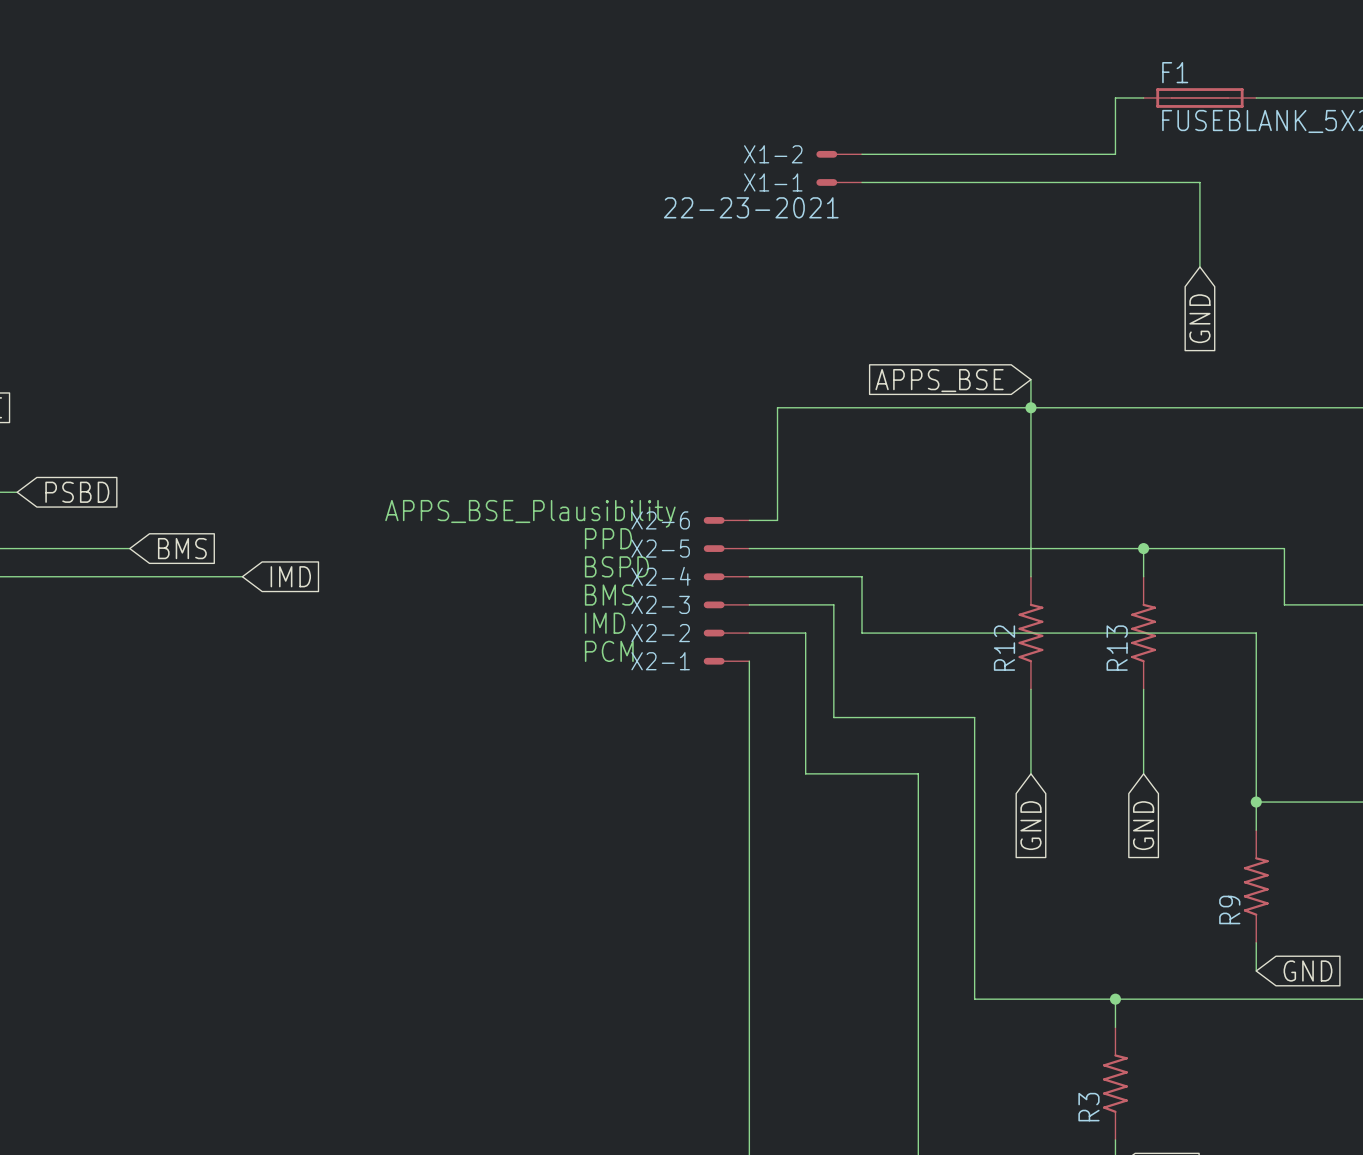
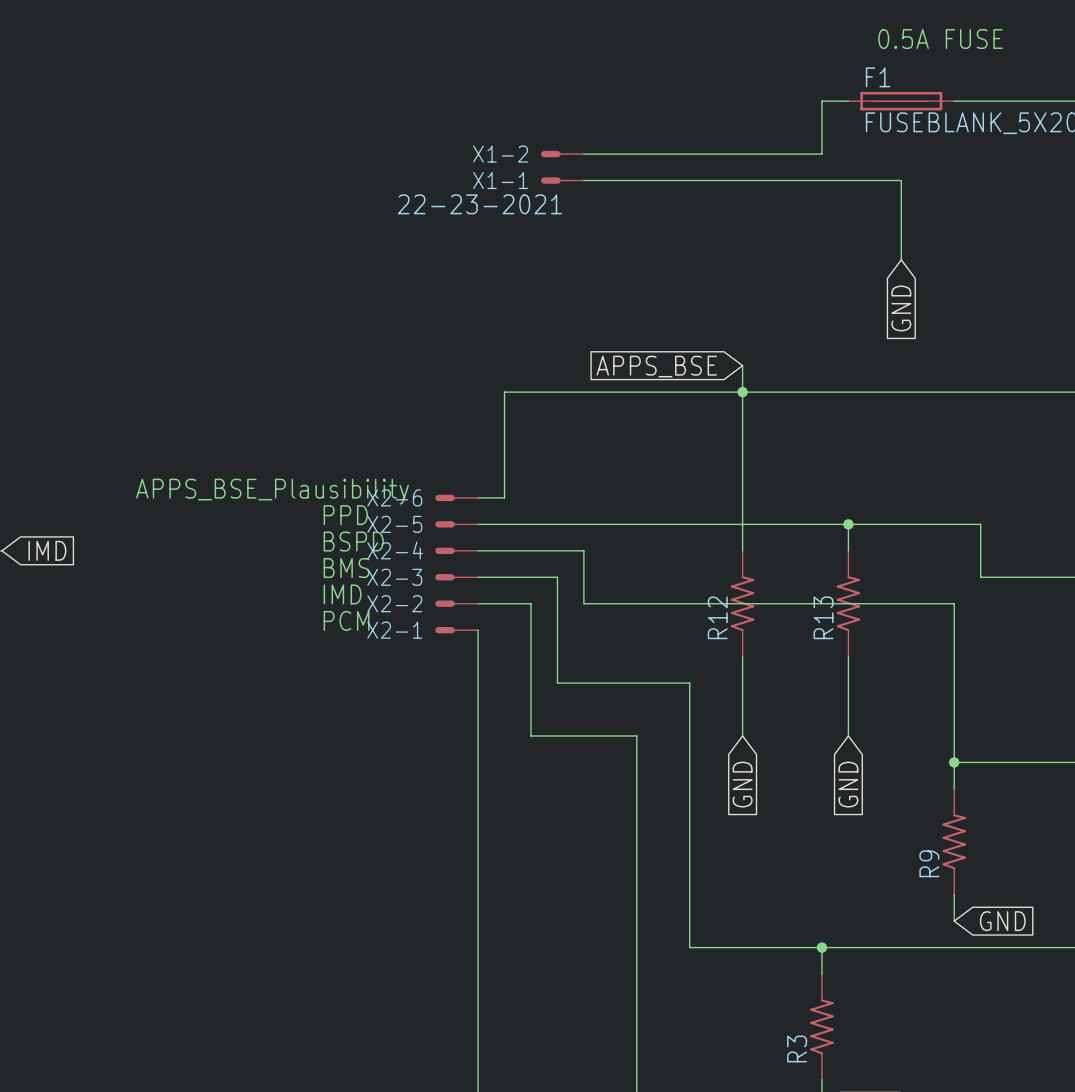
text: none -> 0.5A FUSE (940, 39)

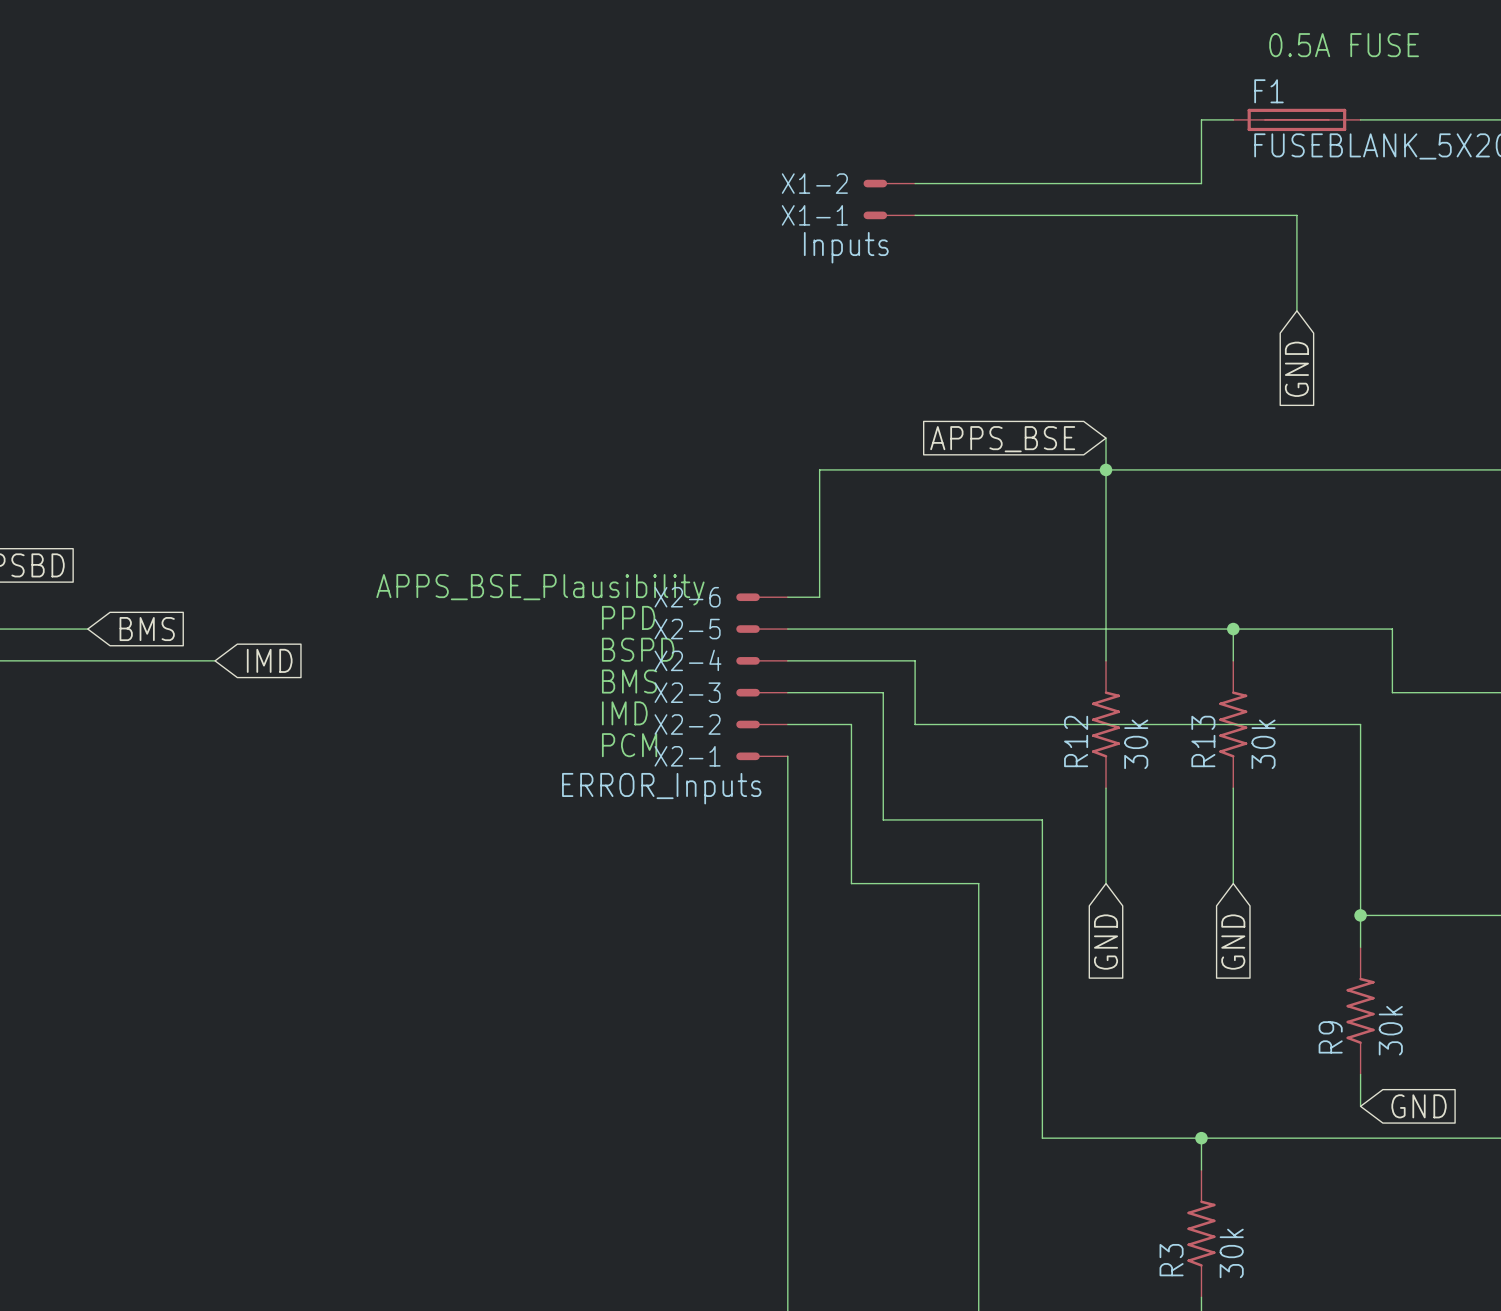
X1-1 value: 22-23-2021 (479, 204) -> Inputs (846, 247)
R12 value: none -> 30k (1136, 744)
R13 value: none -> 30k (1263, 744)
X2-1 value: none -> ERROR_Inputs (661, 788)
R9 value: none -> 30k (1390, 1030)
R3 value: none -> 30k (1231, 1253)

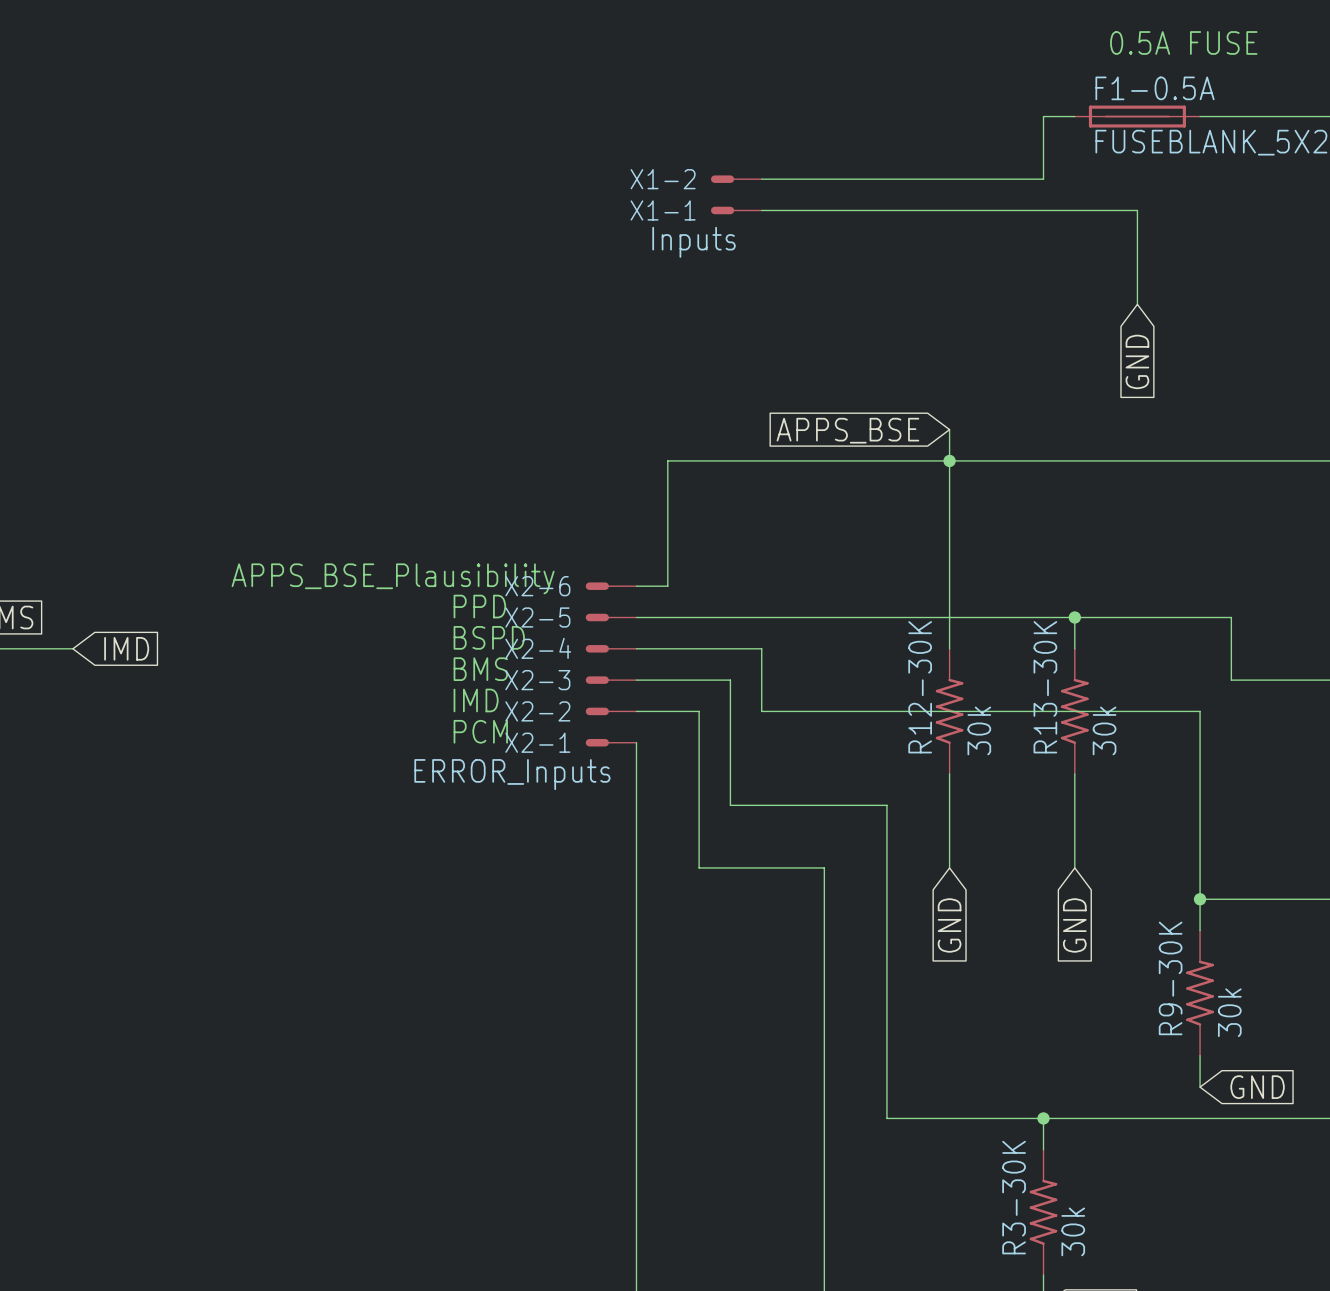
F1 name: F1 (1268, 91) -> F1-0.5A (1155, 88)
R12 name: R12 (1076, 741) -> R12-30K (920, 687)
R13 name: R13 (1203, 741) -> R13-30K (1045, 687)
R9 name: R9 (1330, 1037) -> R9-30K (1170, 978)
R3 name: R3 (1171, 1260) -> R3-30K (1014, 1197)

